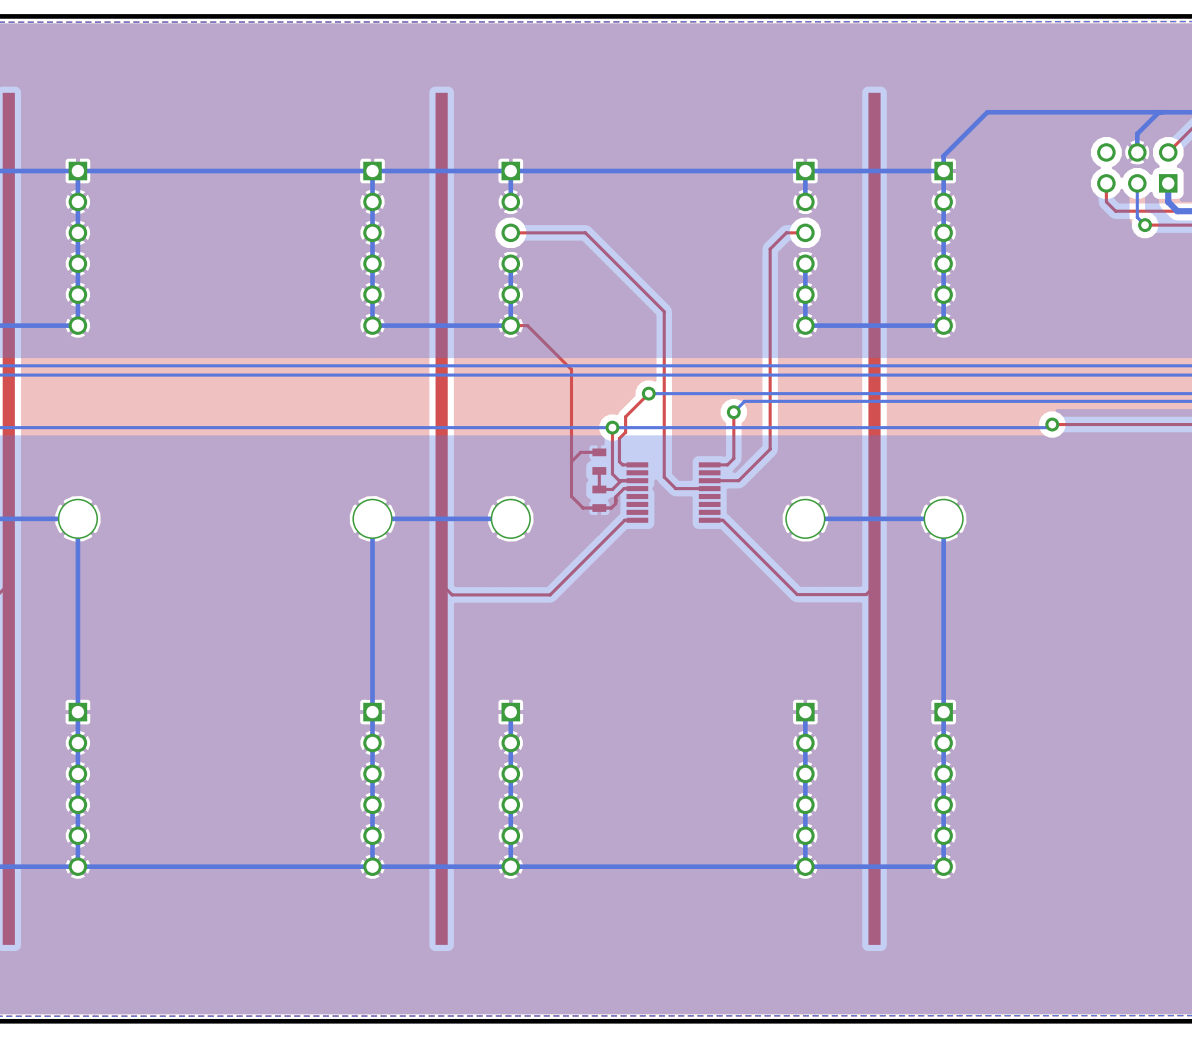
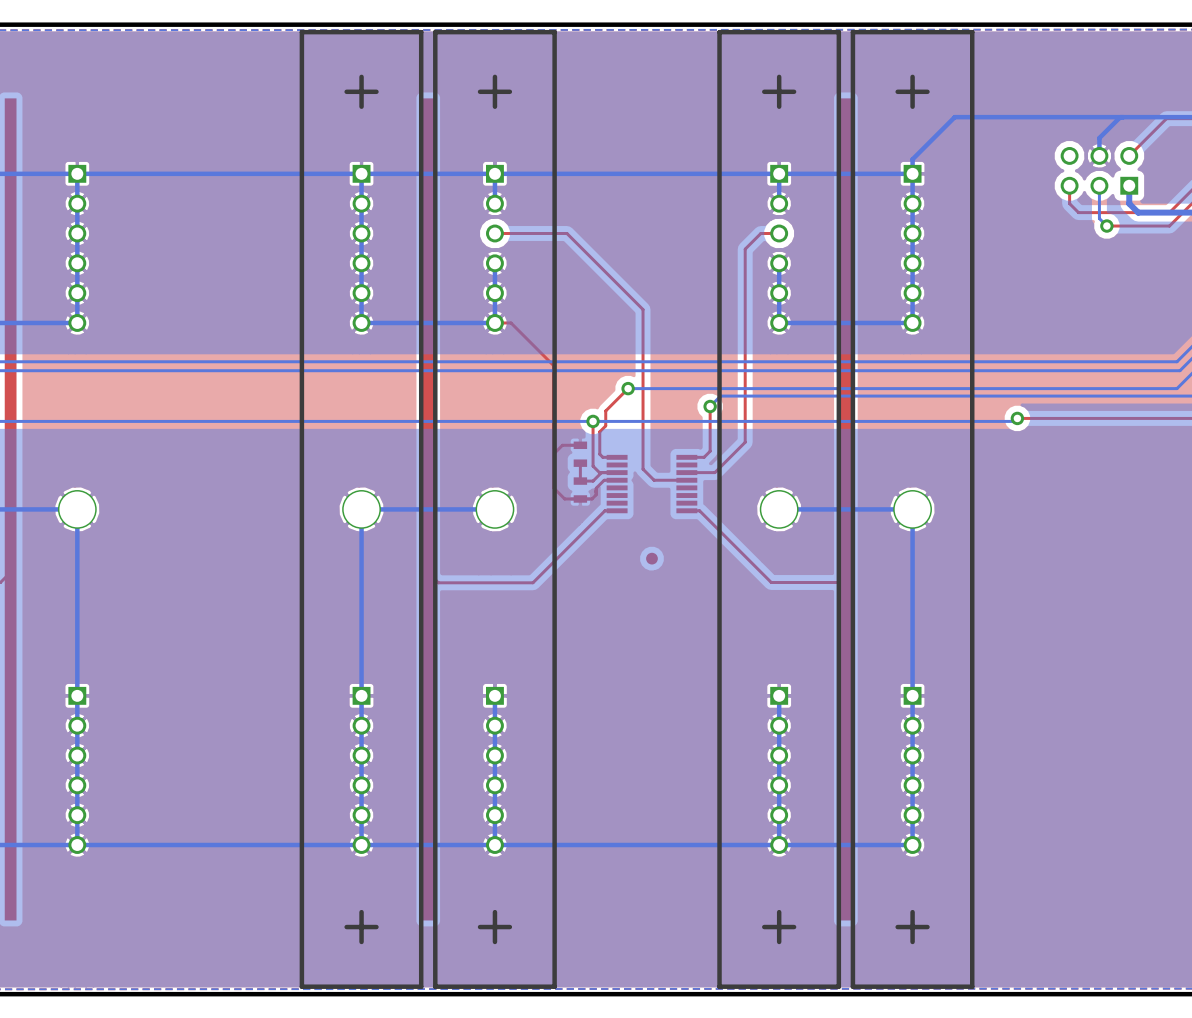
drawing: none -> [299, 29, 557, 989]
drawing: none -> [717, 29, 975, 989]
part: none -> (651, 558)

